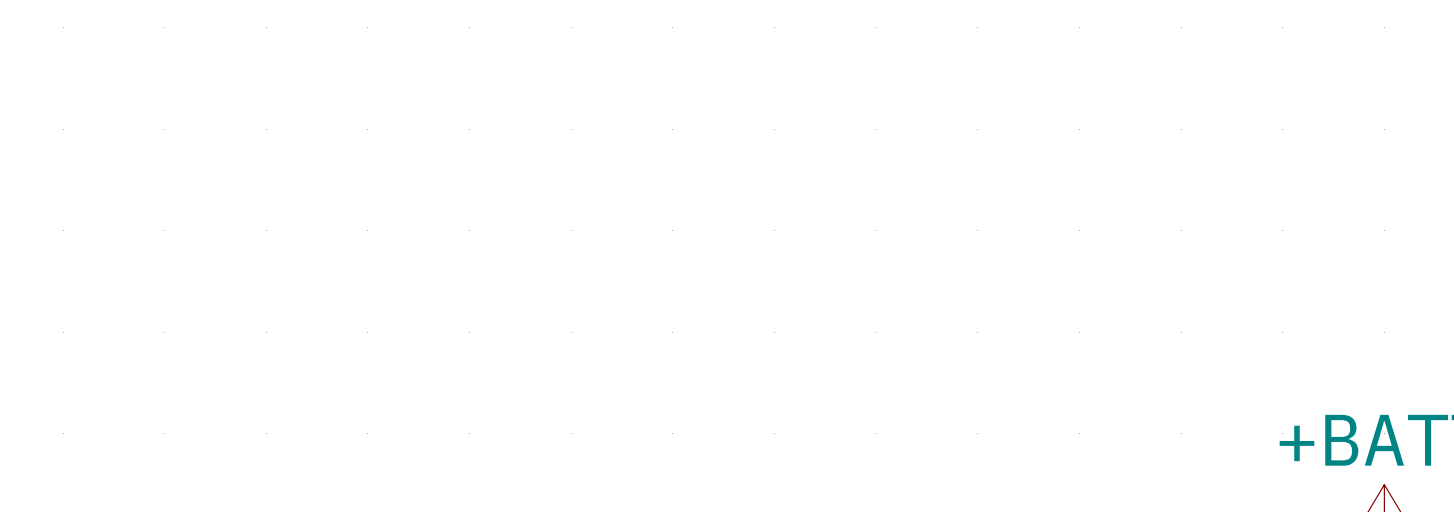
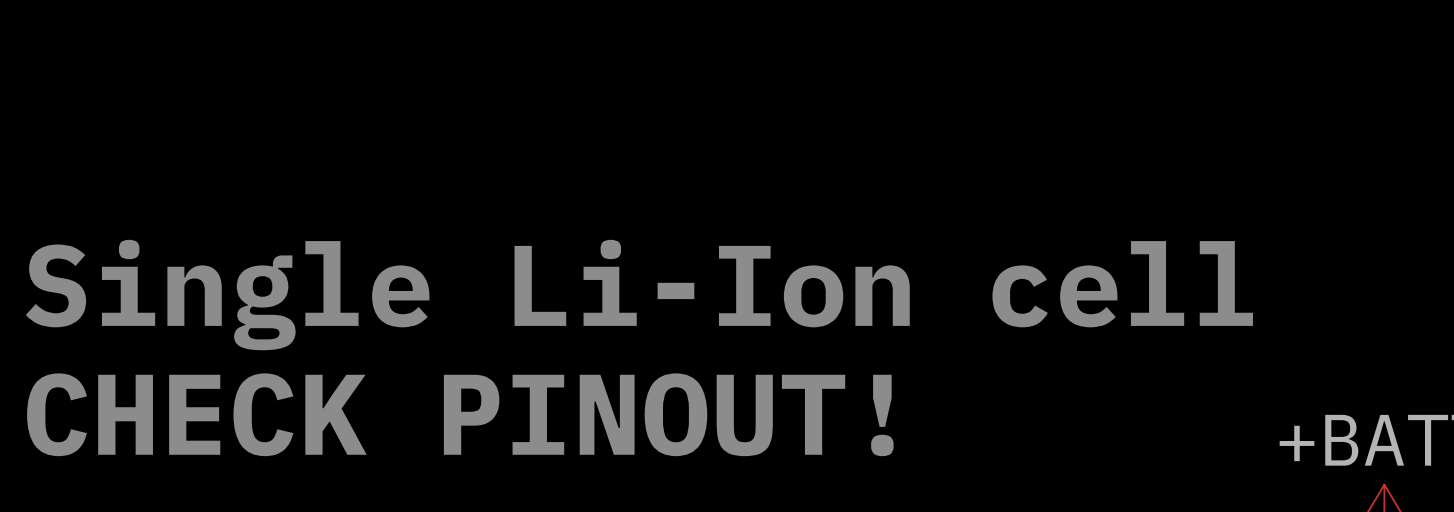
text: none -> Single Li-Ion cell (639, 295)
text: none -> CHECK PINOUT! (460, 414)

